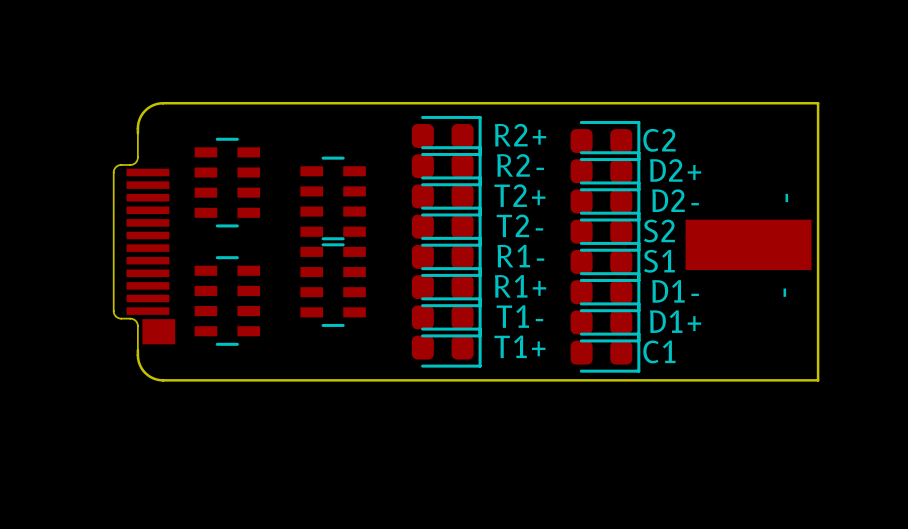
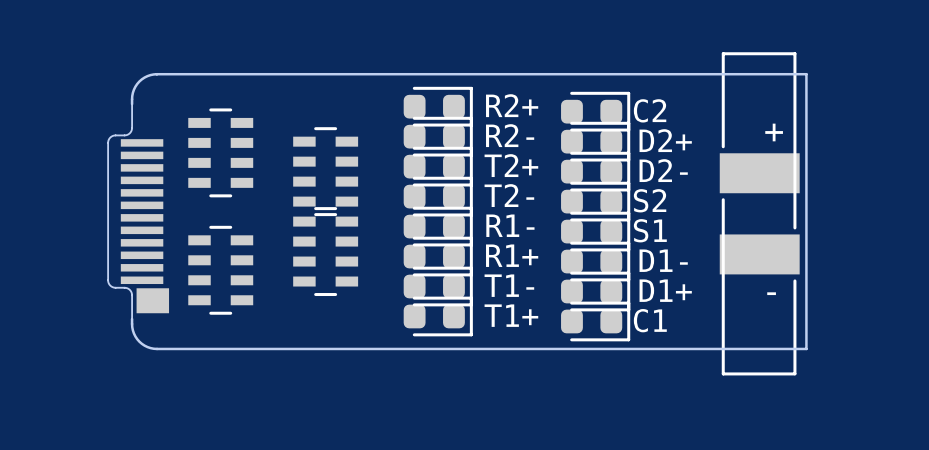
text: none -> + (774, 132)
text: - (786, 197) -> none
part footprint: [685, 219, 812, 271] -> [719, 52, 800, 376]
text rotation: 0° (784, 292) -> 90° clockwise (771, 293)

